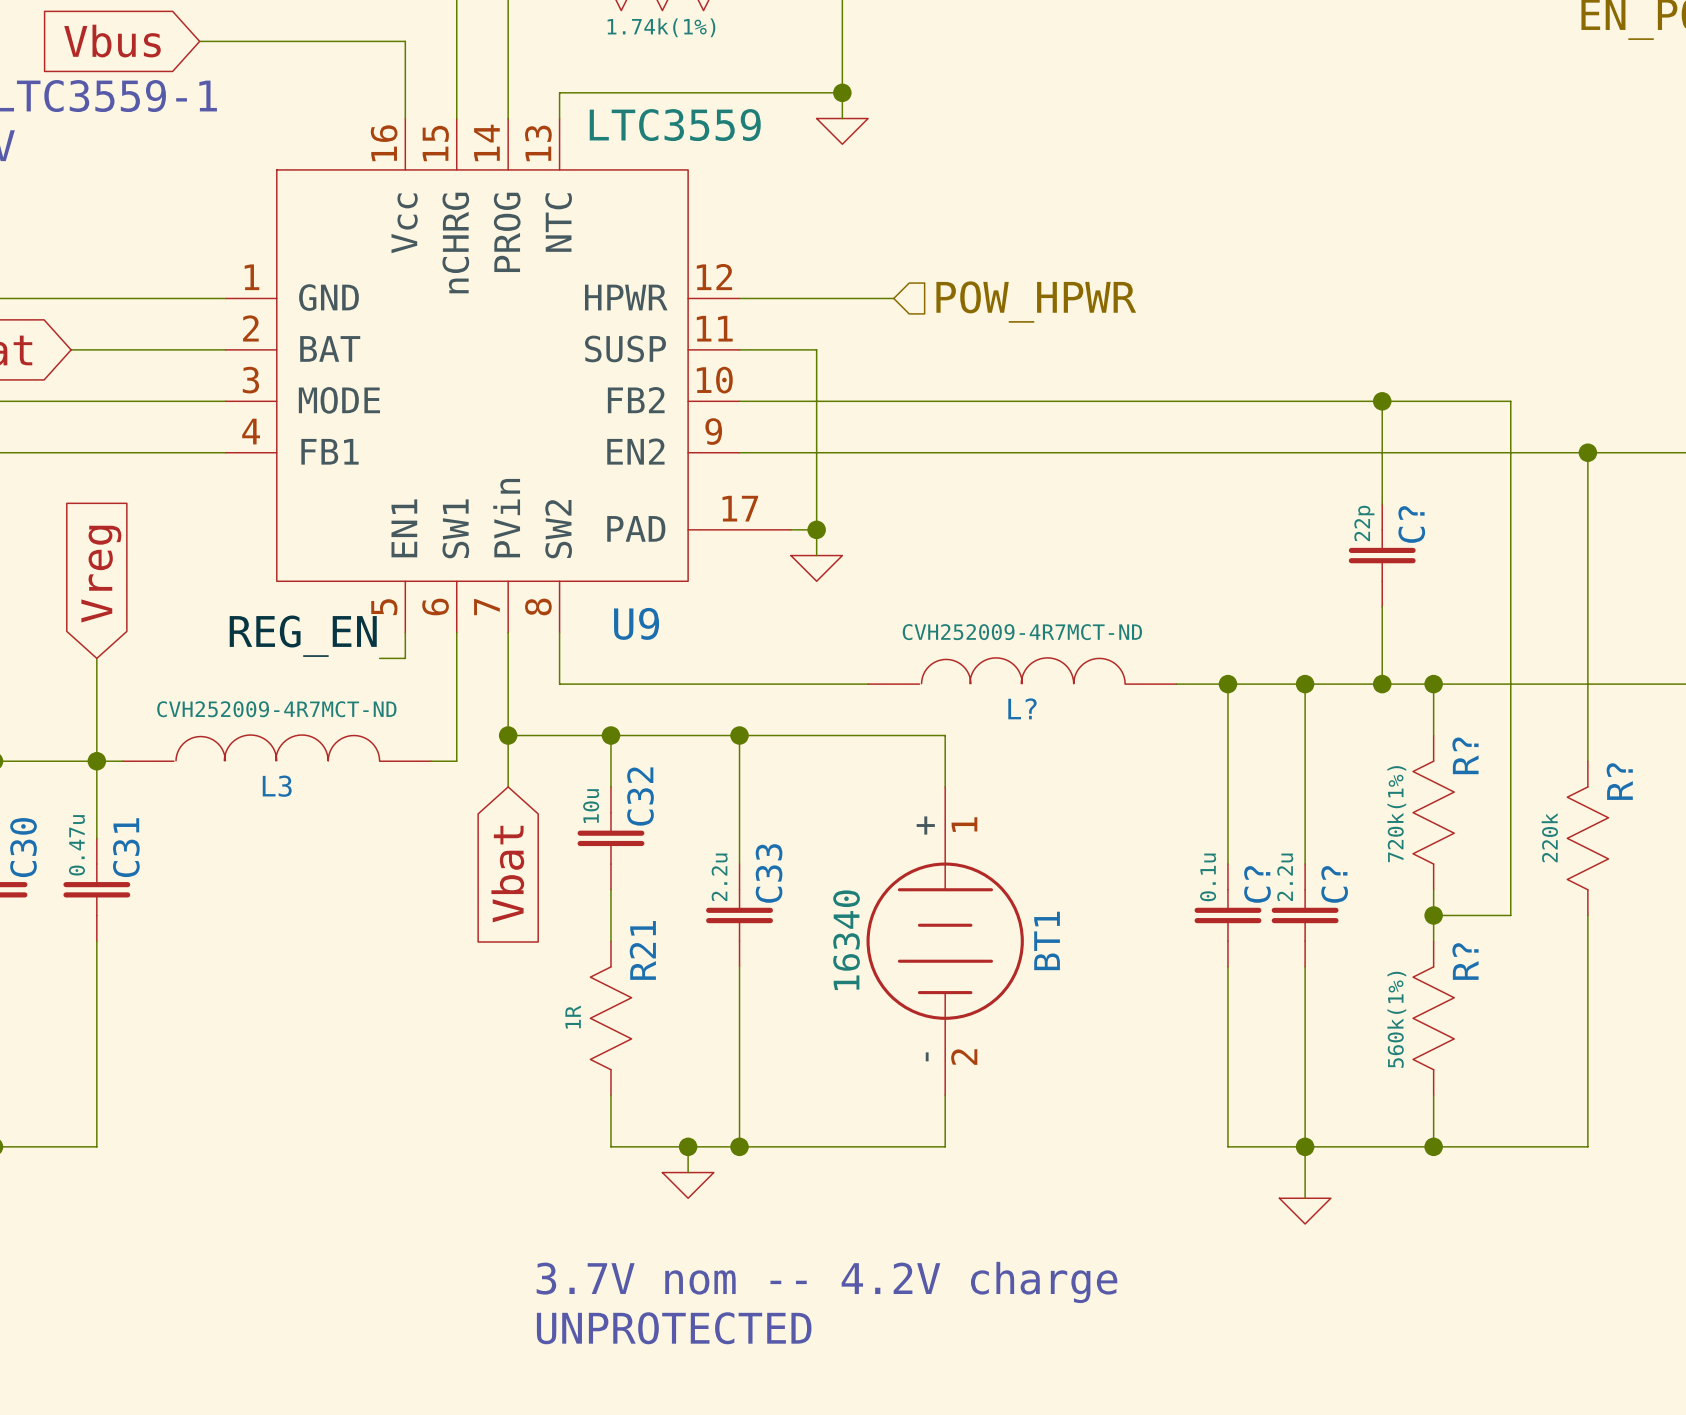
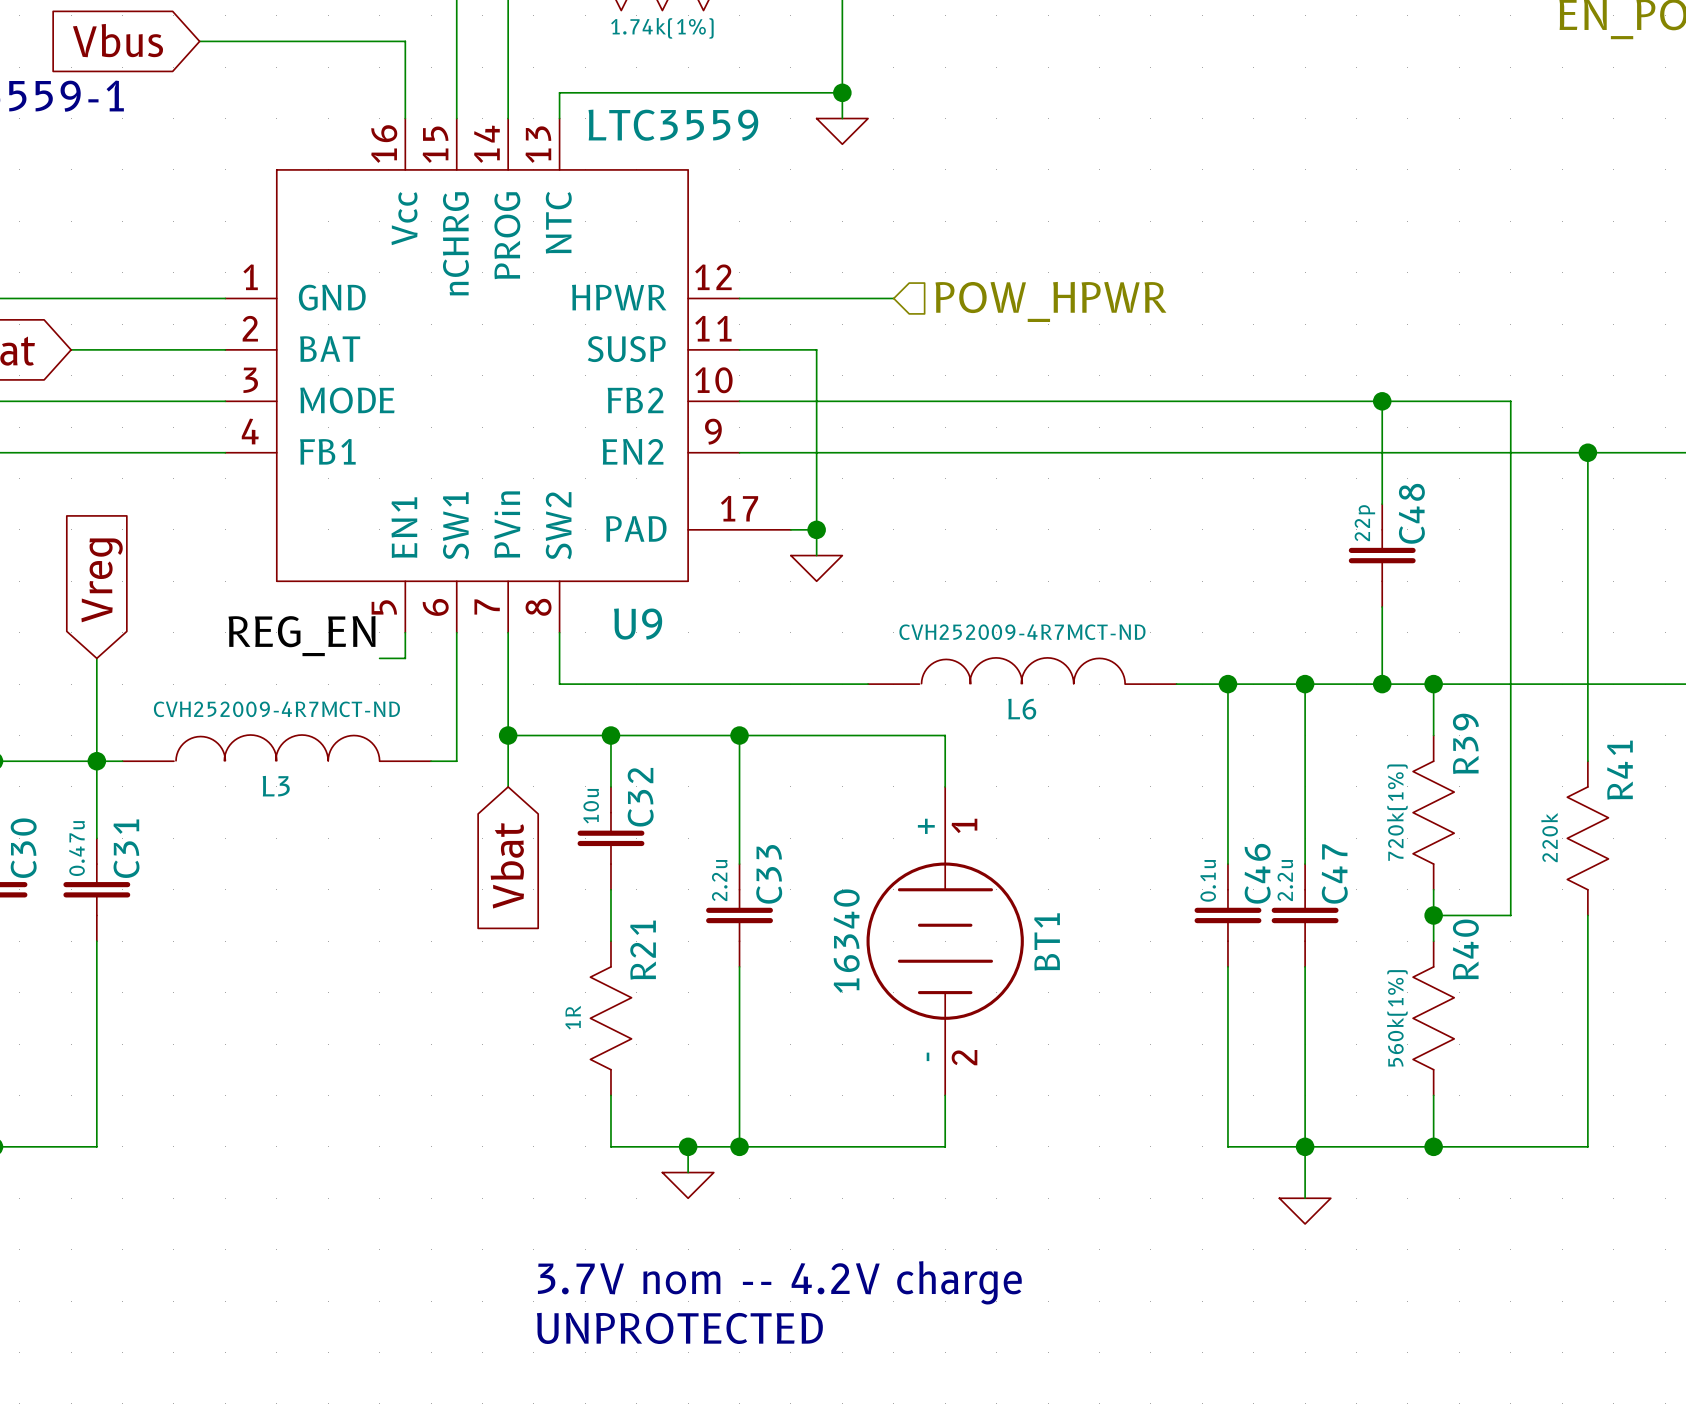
C? name: C? (1411, 524) -> C48 (1411, 513)
L? name: L? (1022, 708) -> L6 (1022, 709)
R? name: R? (1465, 755) -> R39 (1465, 743)
R? name: R? (1619, 781) -> R41 (1619, 770)
C? name: C? (1257, 884) -> C46 (1257, 873)
C? name: C? (1334, 884) -> C47 (1334, 873)
R? name: R? (1465, 961) -> R40 (1465, 949)

